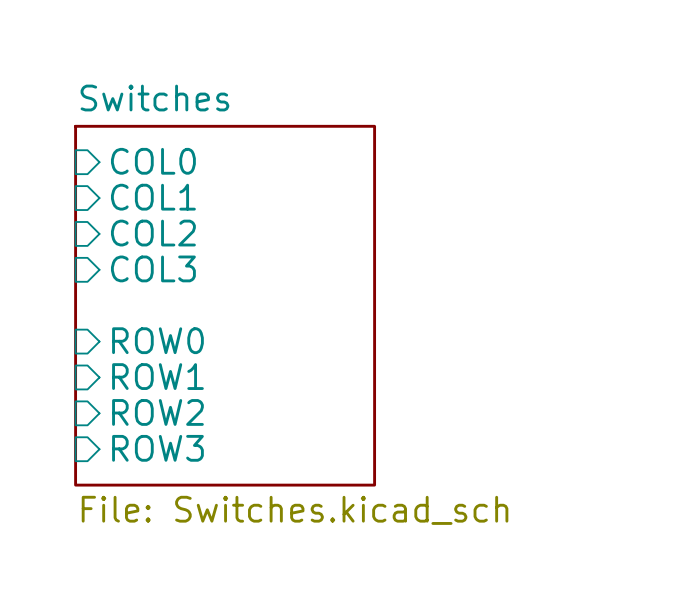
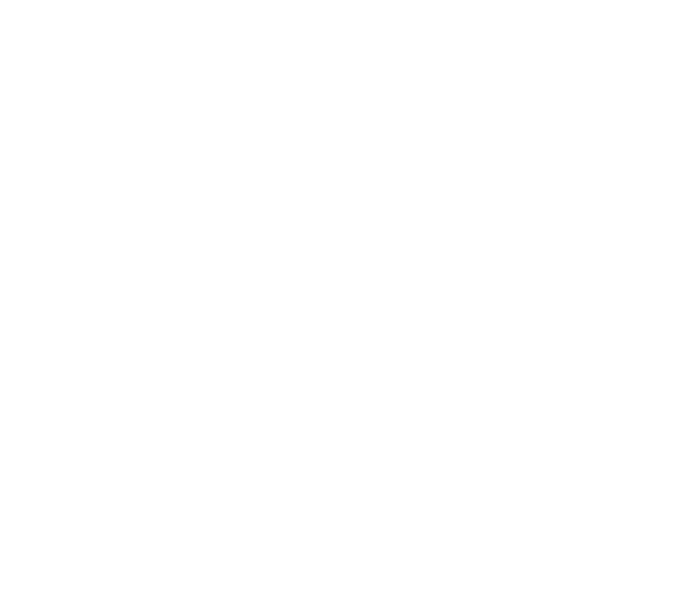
sheet pin: COL0 (153, 161) -> none
sheet pin: COL1 (153, 197) -> none
sheet pin: COL2 (153, 233) -> none
sheet pin: COL3 (153, 268) -> none
sheet Switches: File: Switches.kicad_sch (225, 305) -> none
sheet pin: ROW0 (157, 340) -> none
sheet pin: ROW1 (157, 376) -> none
sheet pin: ROW2 (157, 412) -> none
sheet pin: ROW3 (157, 448) -> none

